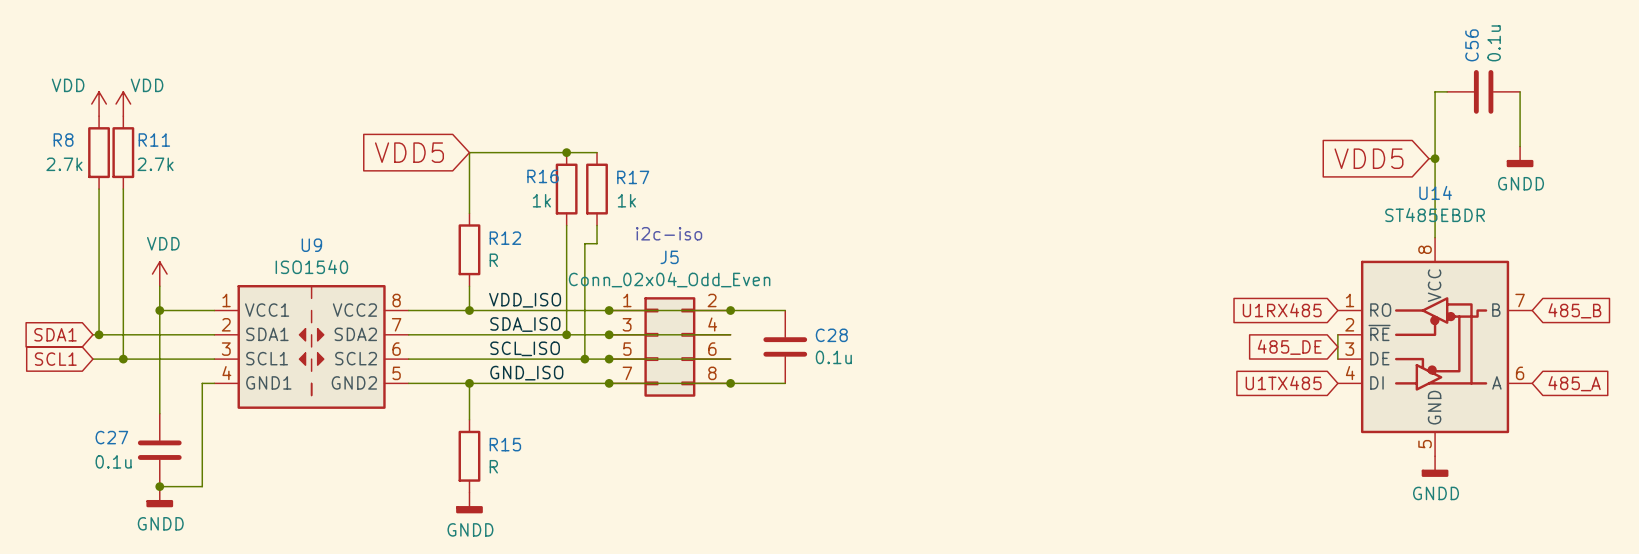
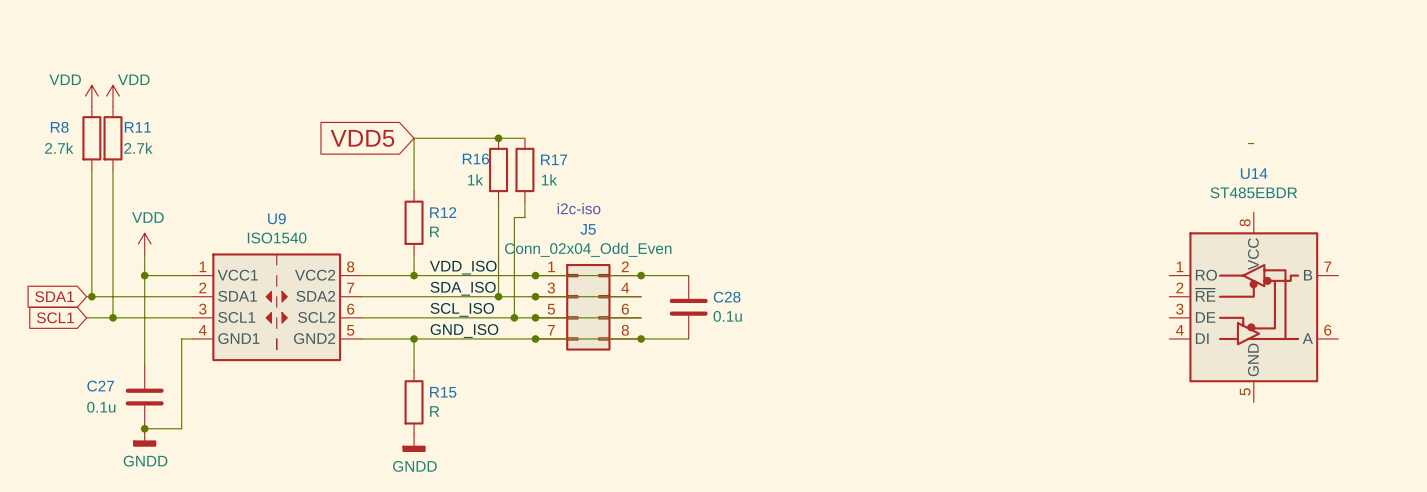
wire: (1447, 91) (1435, 91) (1435, 237) -> none
C56: 0.1u (1483, 91) -> none
wire: (1520, 91) (1520, 146) -> none
power symbol: GNDD (1520, 156) -> none
global label: VDD5 (1368, 158) -> none
junction: (1435, 158) -> none
global label: U1RX485 (1282, 310) -> none
global label: 485_B (1574, 310) -> none
wire: (1337, 334) (1337, 359) -> none
global label: 485_DE (1289, 347) -> none
global label: U1TX485 (1283, 383) -> none
global label: 485_A (1574, 383) -> none
power symbol: GNDD (1435, 466) -> none

